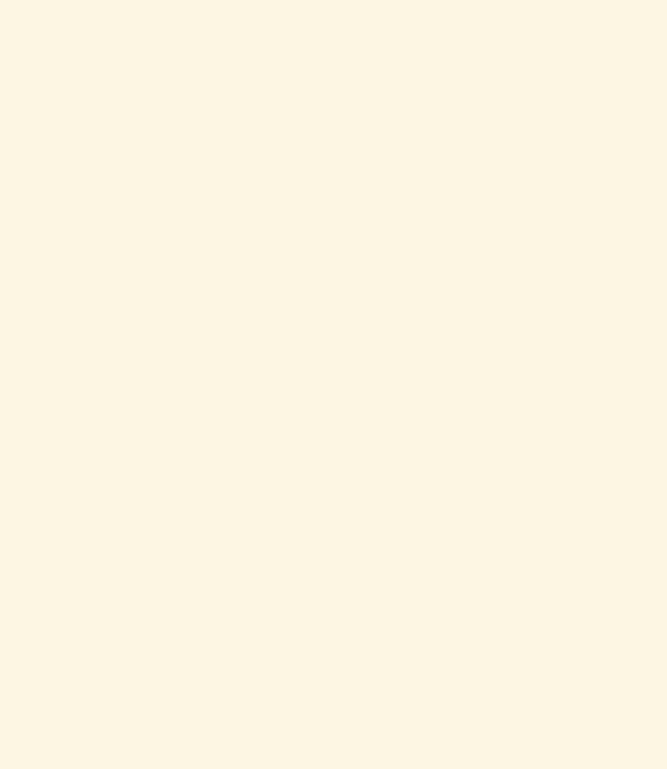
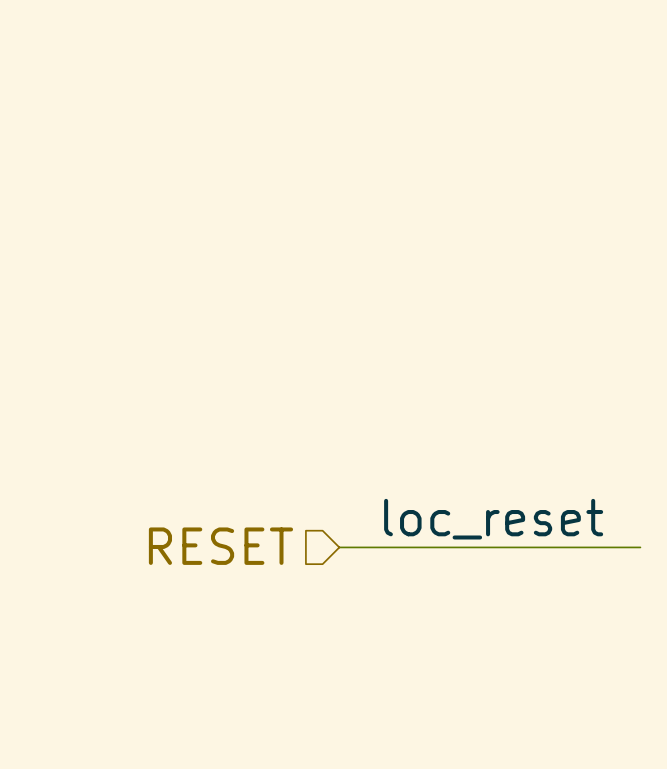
label: none -> loc_reset (493, 519)
hierarchical label: none -> RESET (220, 546)
wire: none -> (339, 547) (640, 547)

